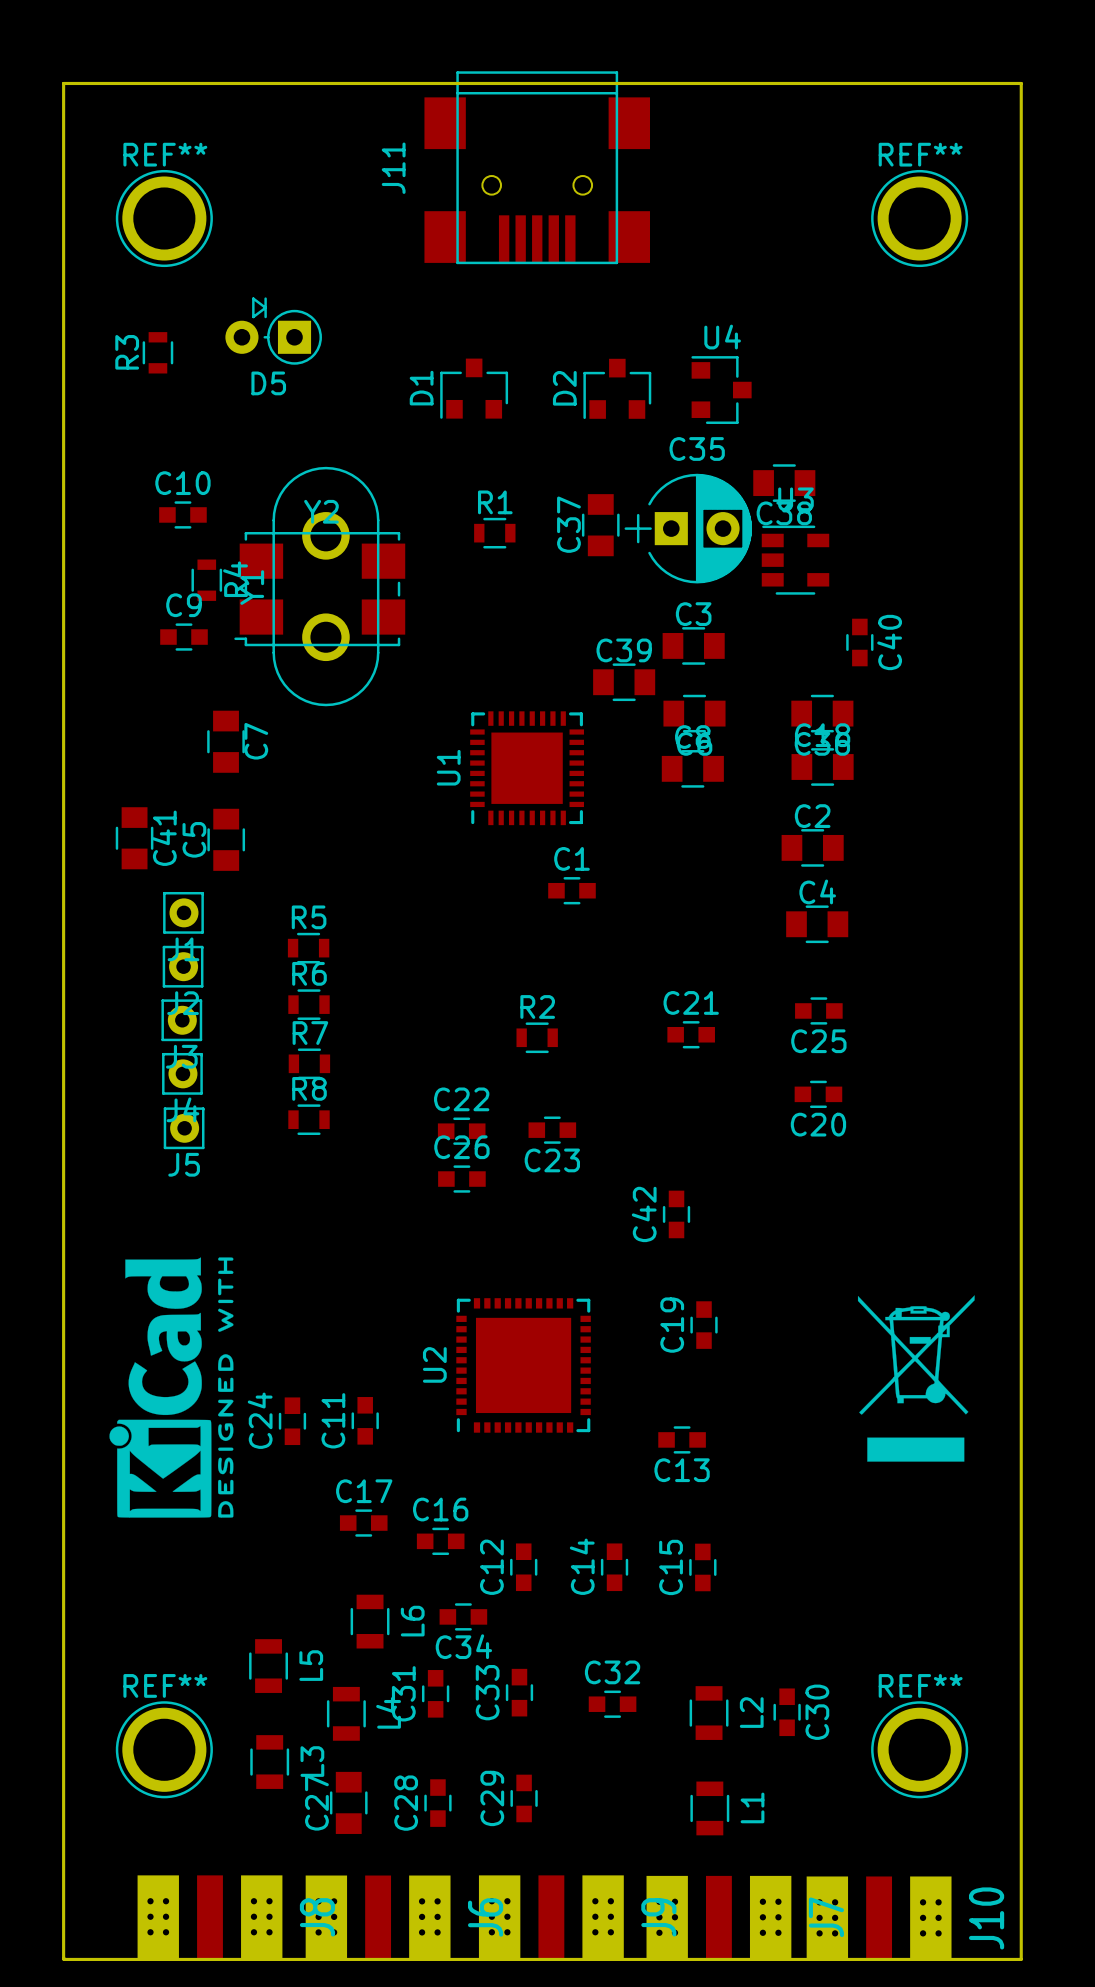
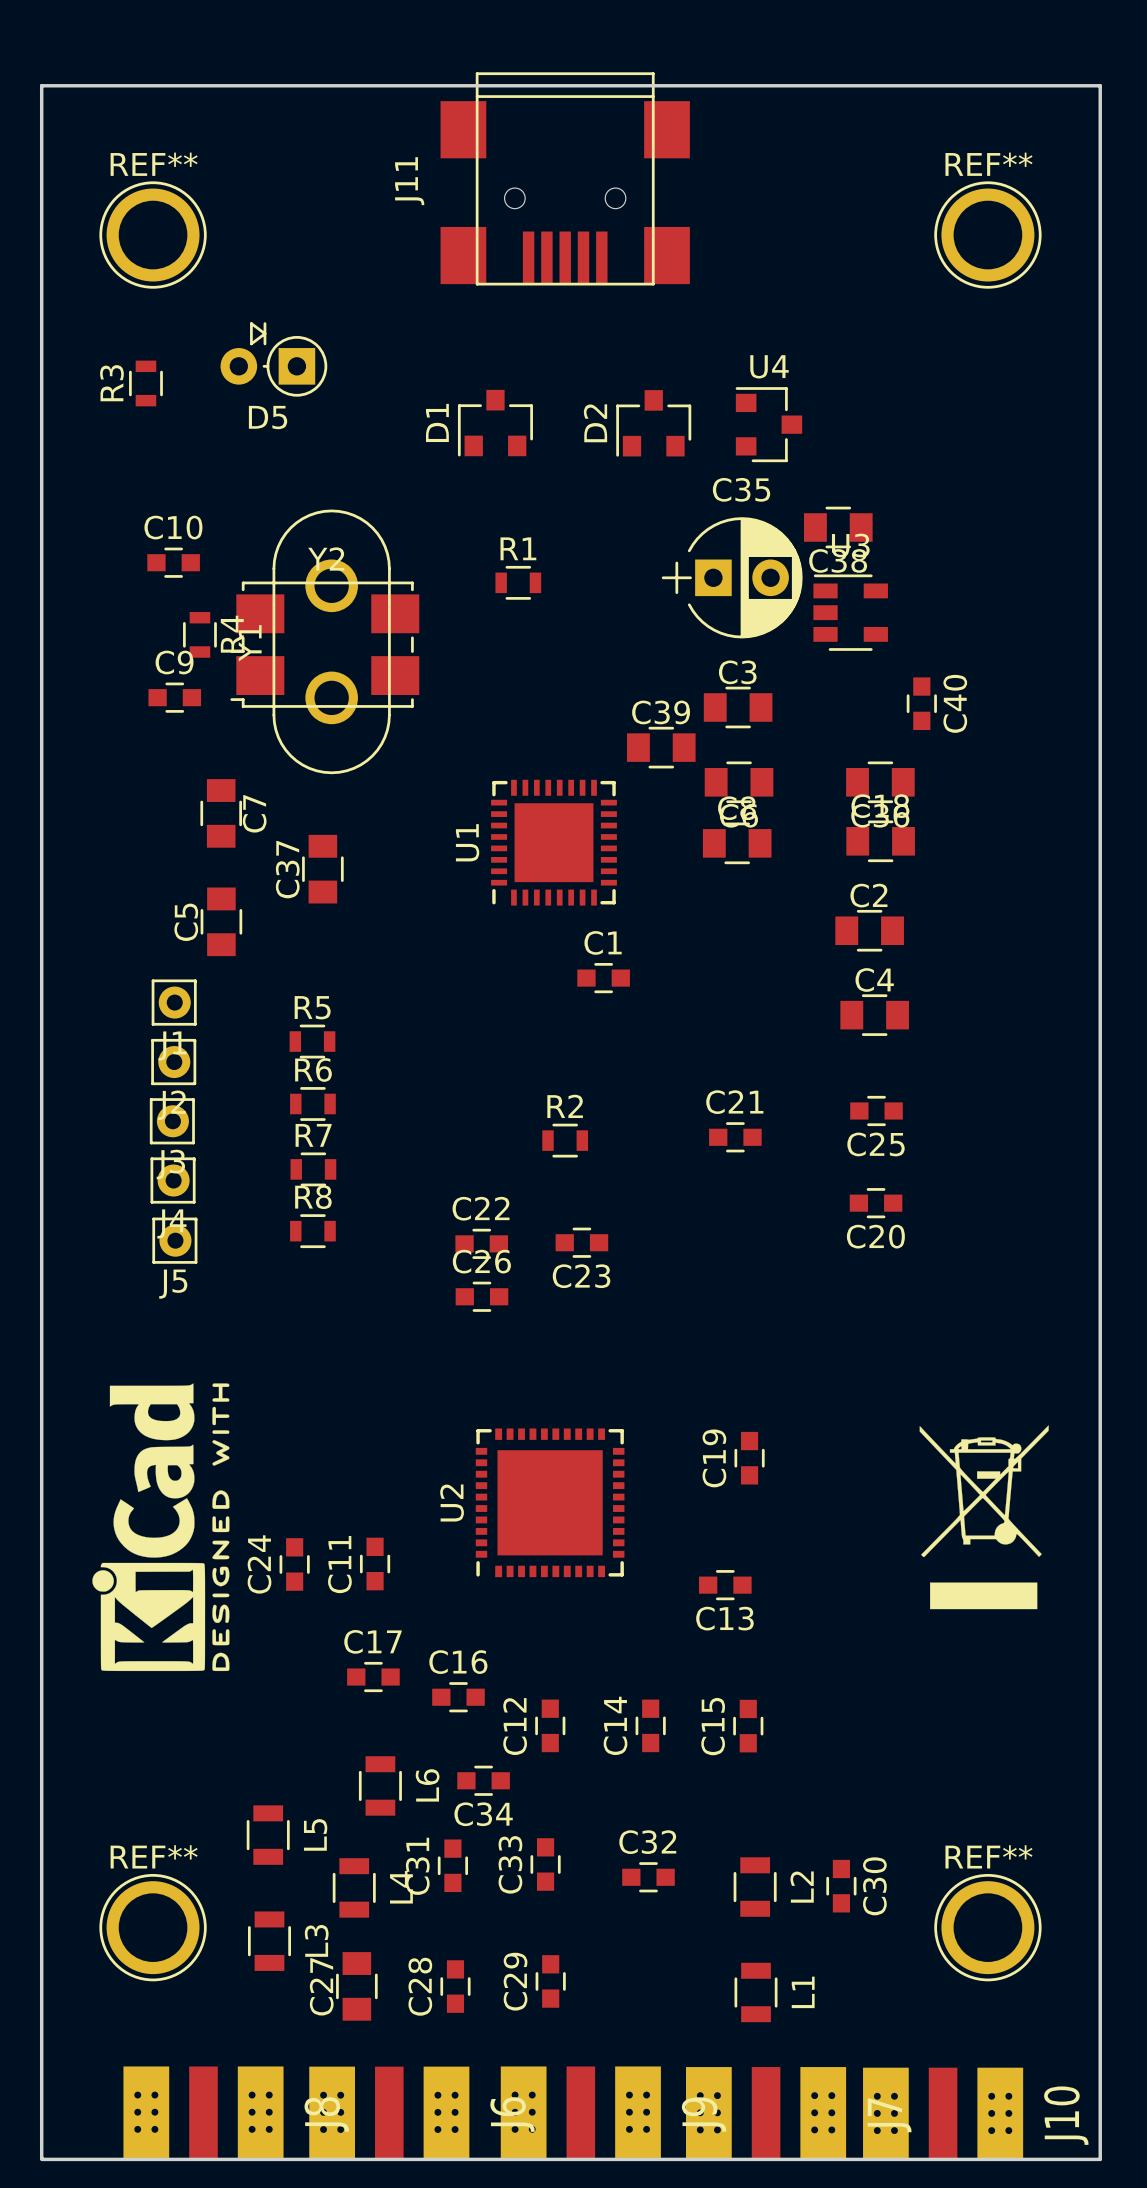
C37 position: (600, 525) -> (322, 869)
C41: (134, 838) -> none
C42: (676, 1214) -> none

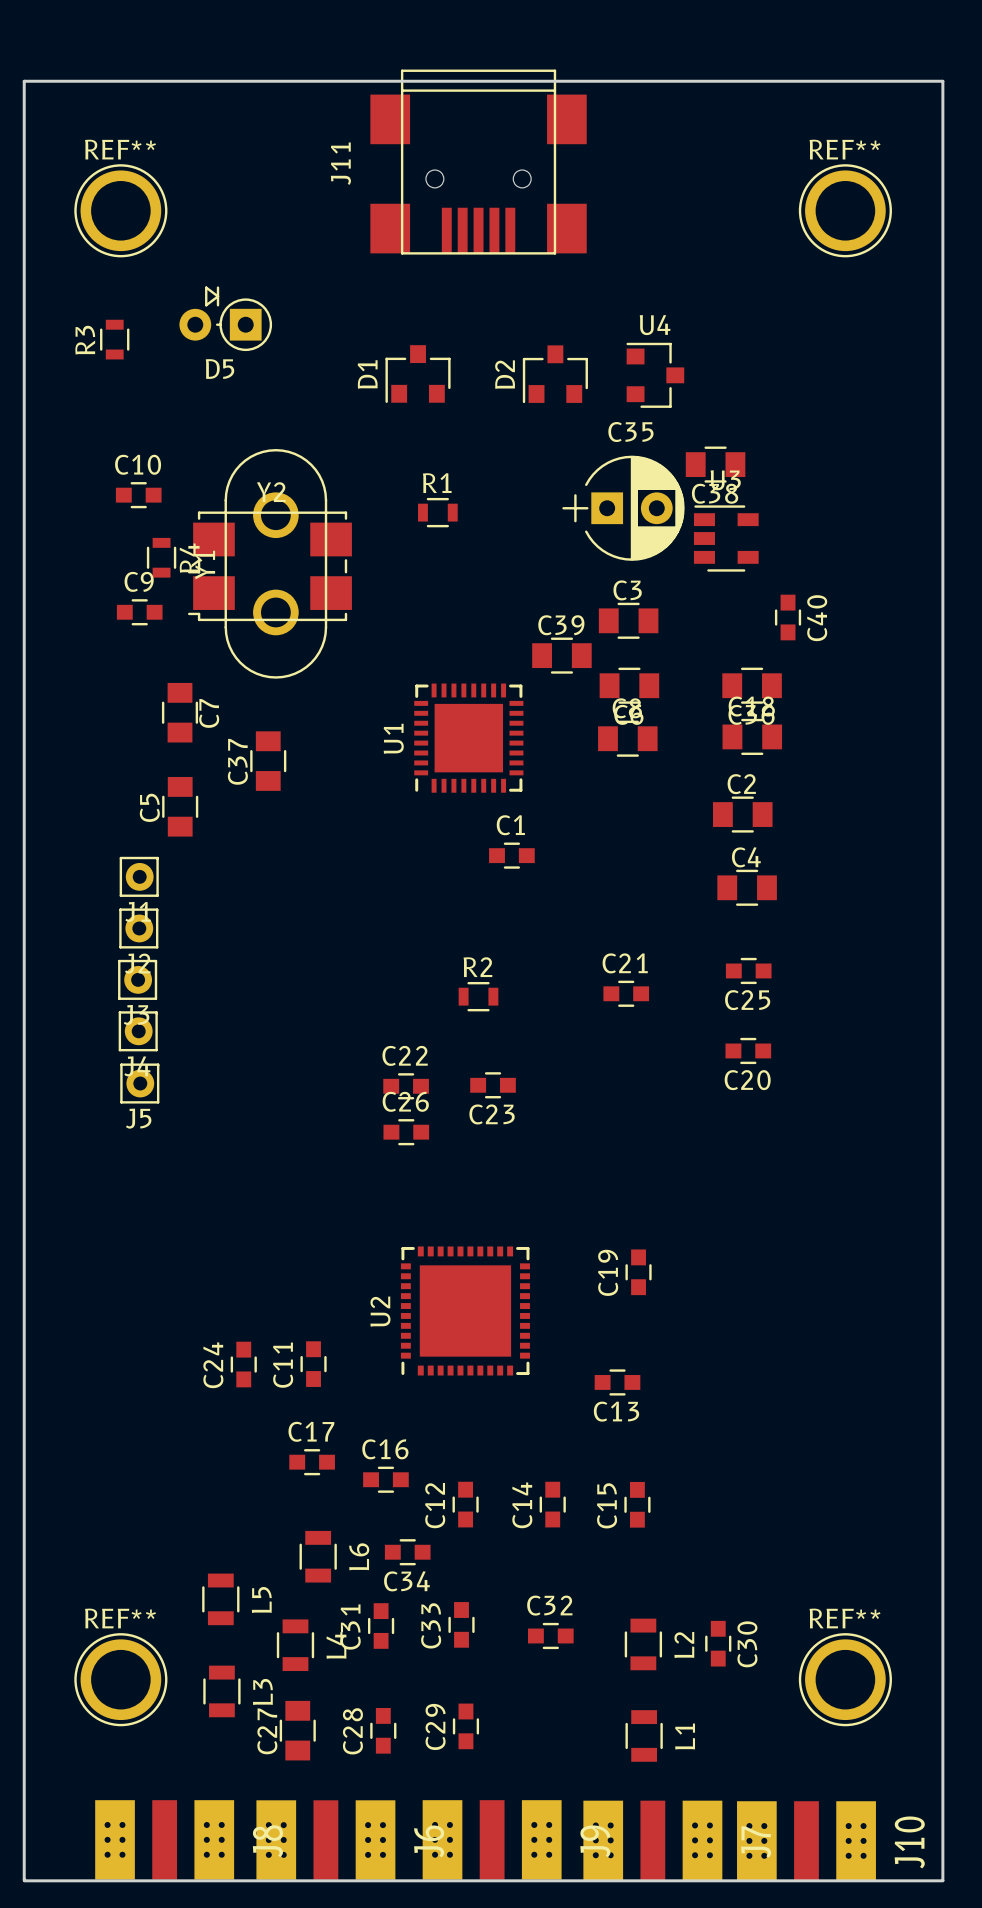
R5: (312, 1041) -> none
R6: (312, 1103) -> none
R7: (313, 1169) -> none
R8: (312, 1231) -> none
drawing: [92, 1383, 230, 1672] -> none
drawing: [919, 1425, 1049, 1610] -> none

